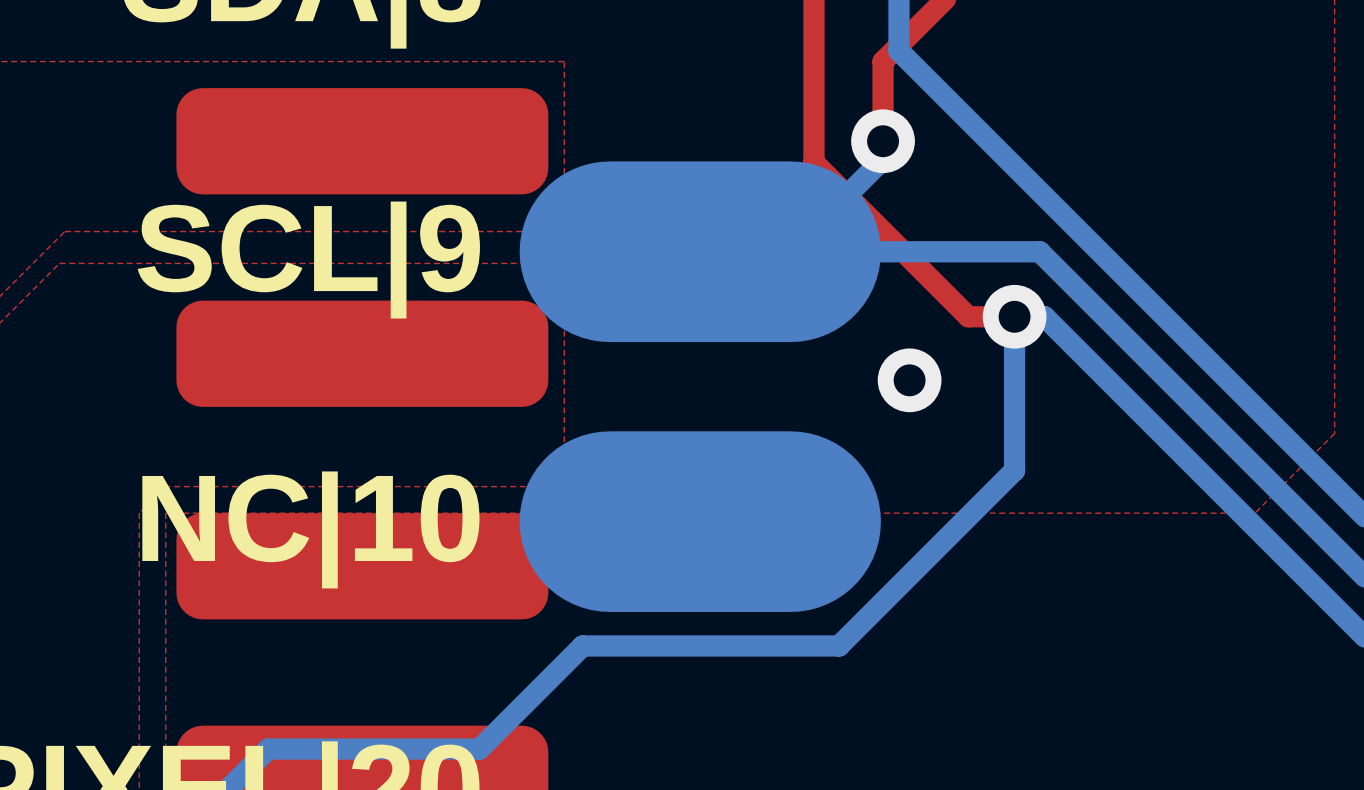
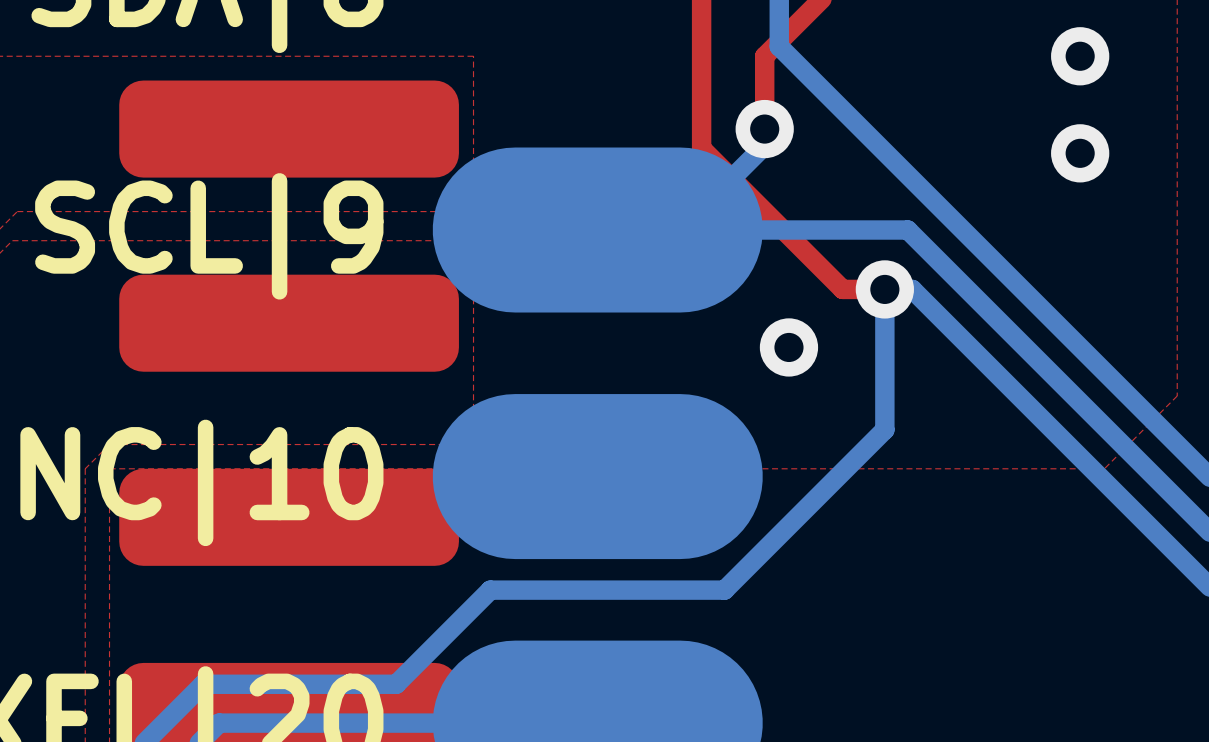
via: none -> (1080, 56)
via: none -> (1080, 153)

